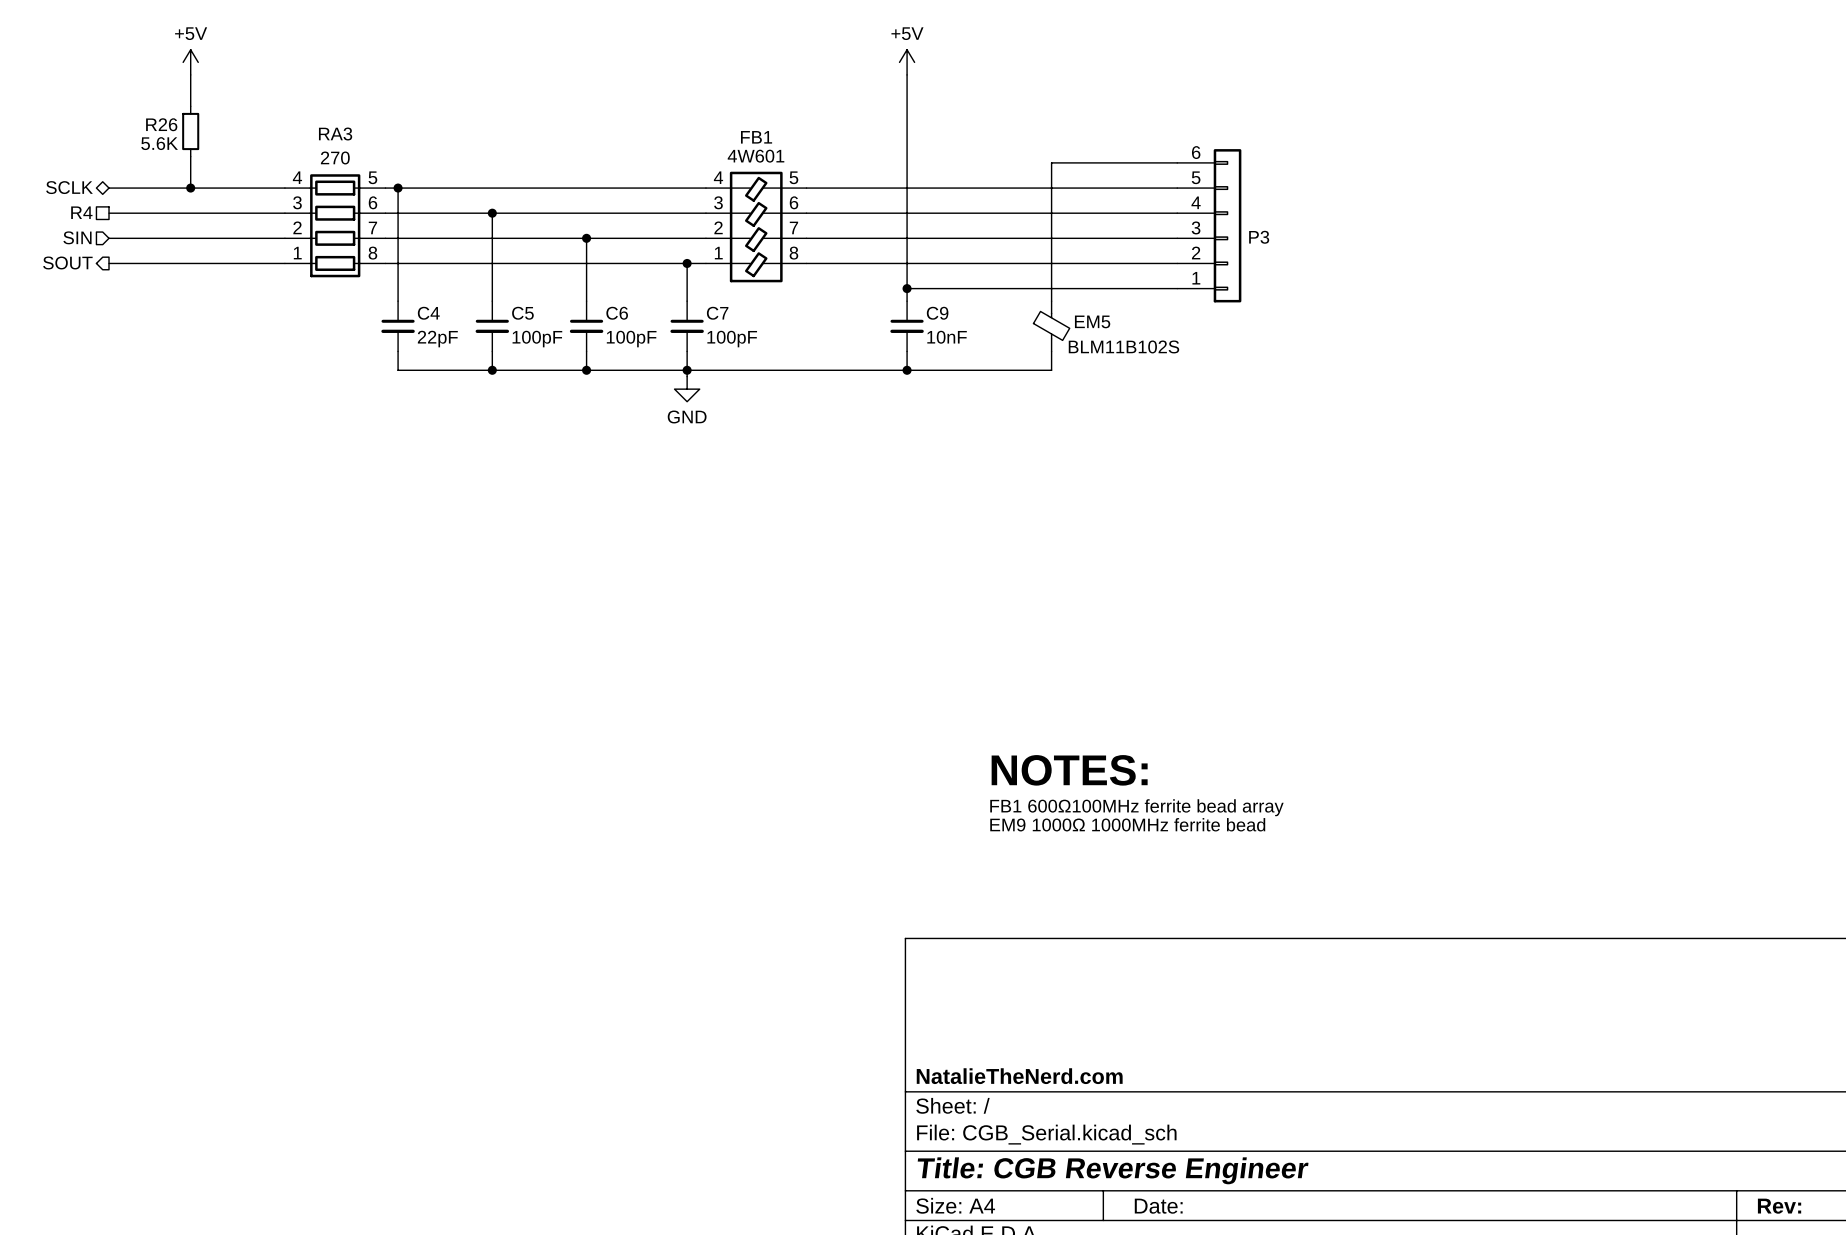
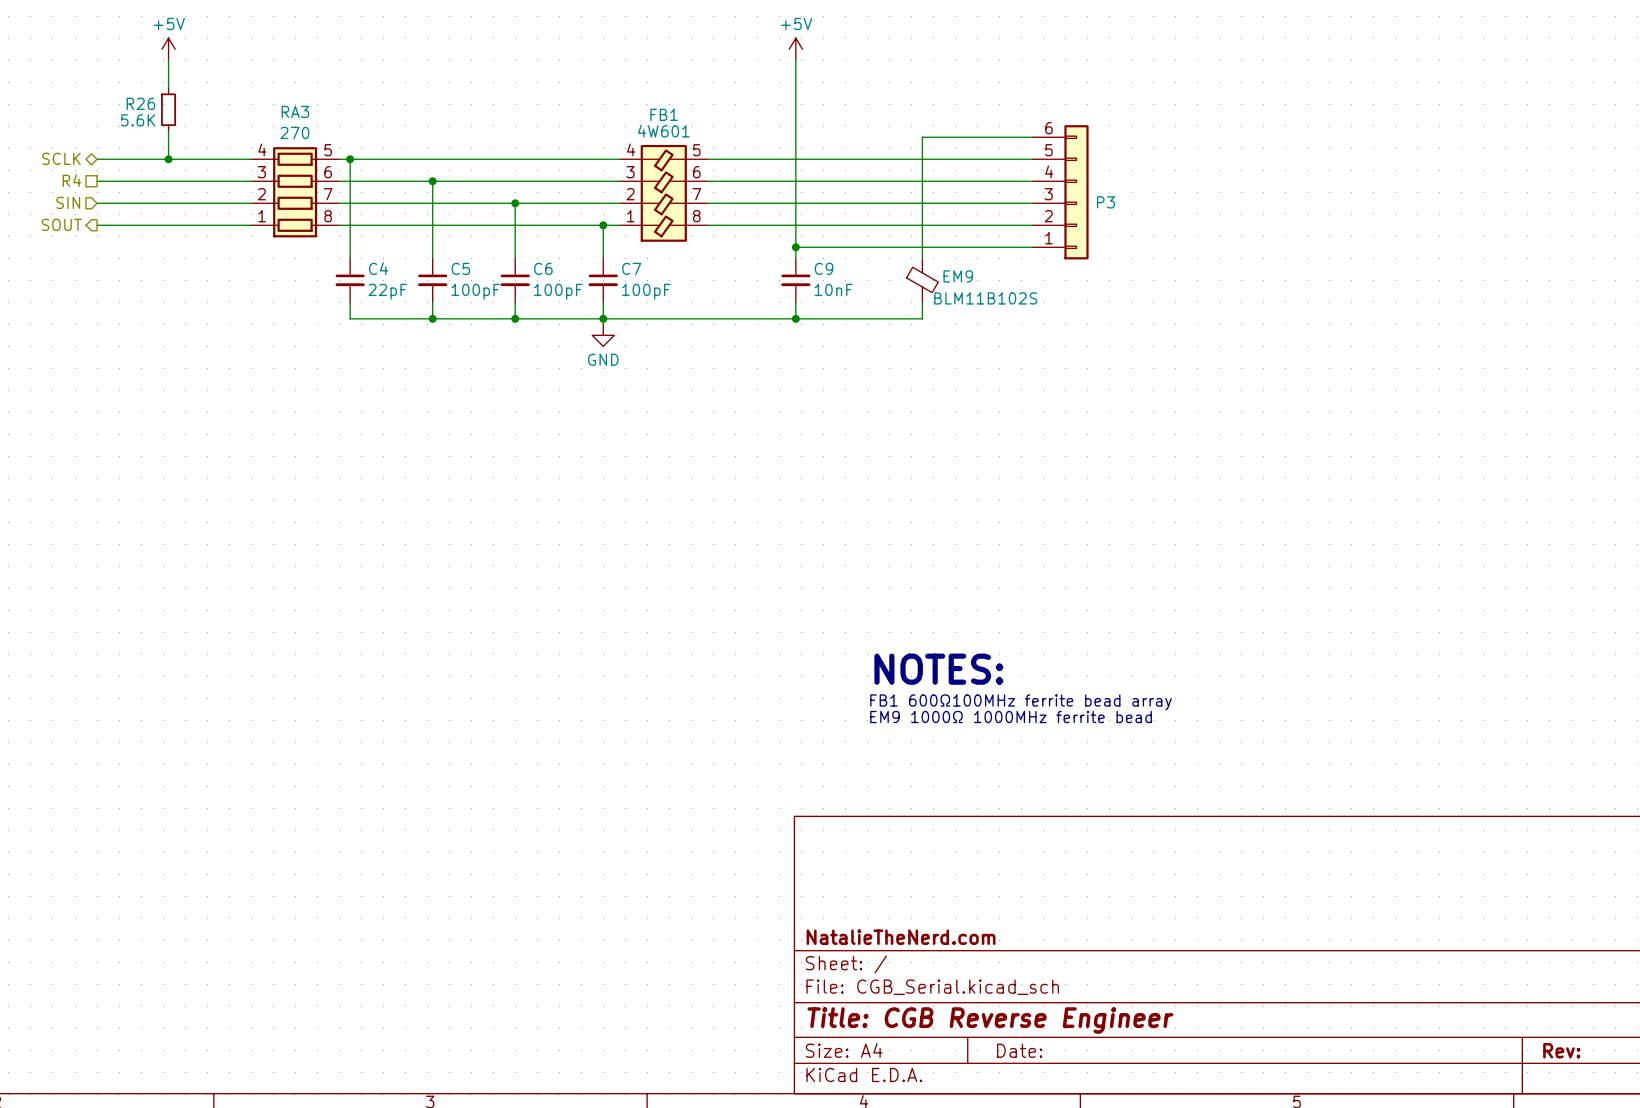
EM5 name: EM5 (1092, 321) -> EM9 (958, 276)

